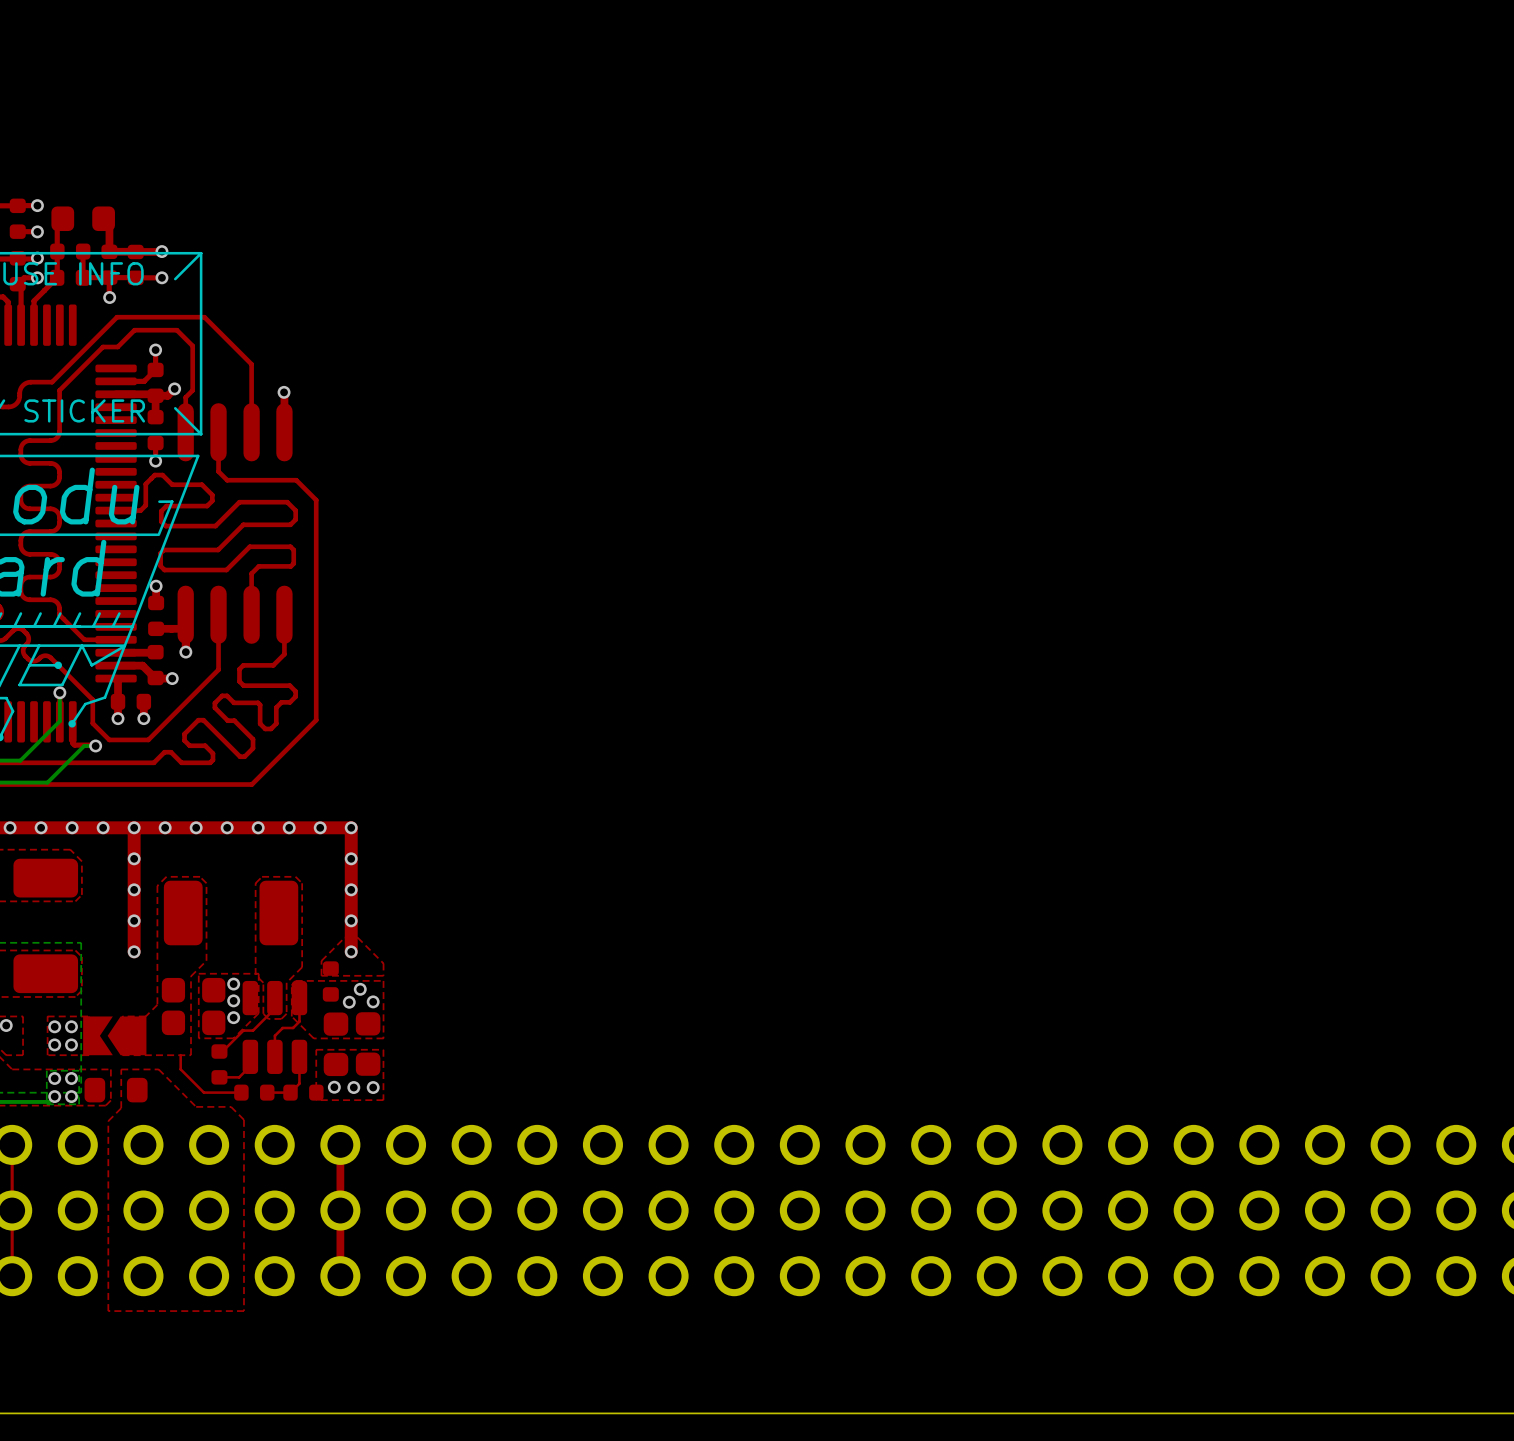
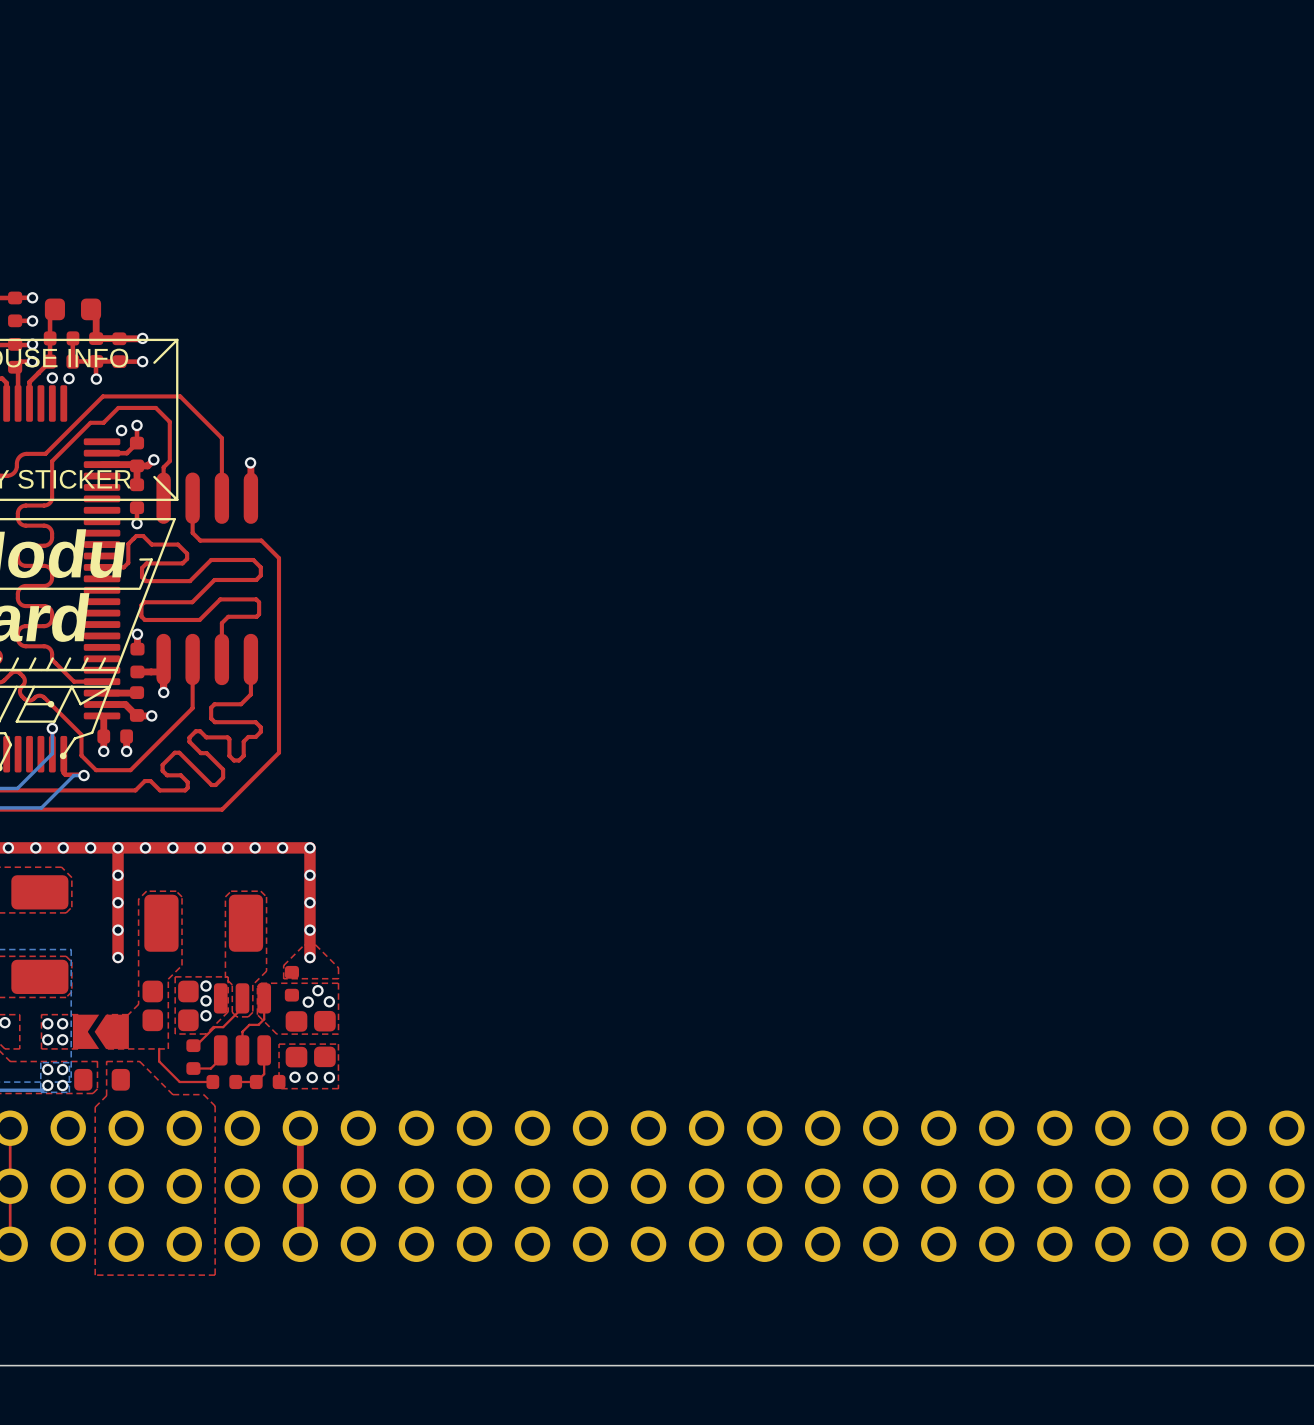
via: none -> (52, 378)
via: none -> (69, 378)
via: none -> (121, 430)

